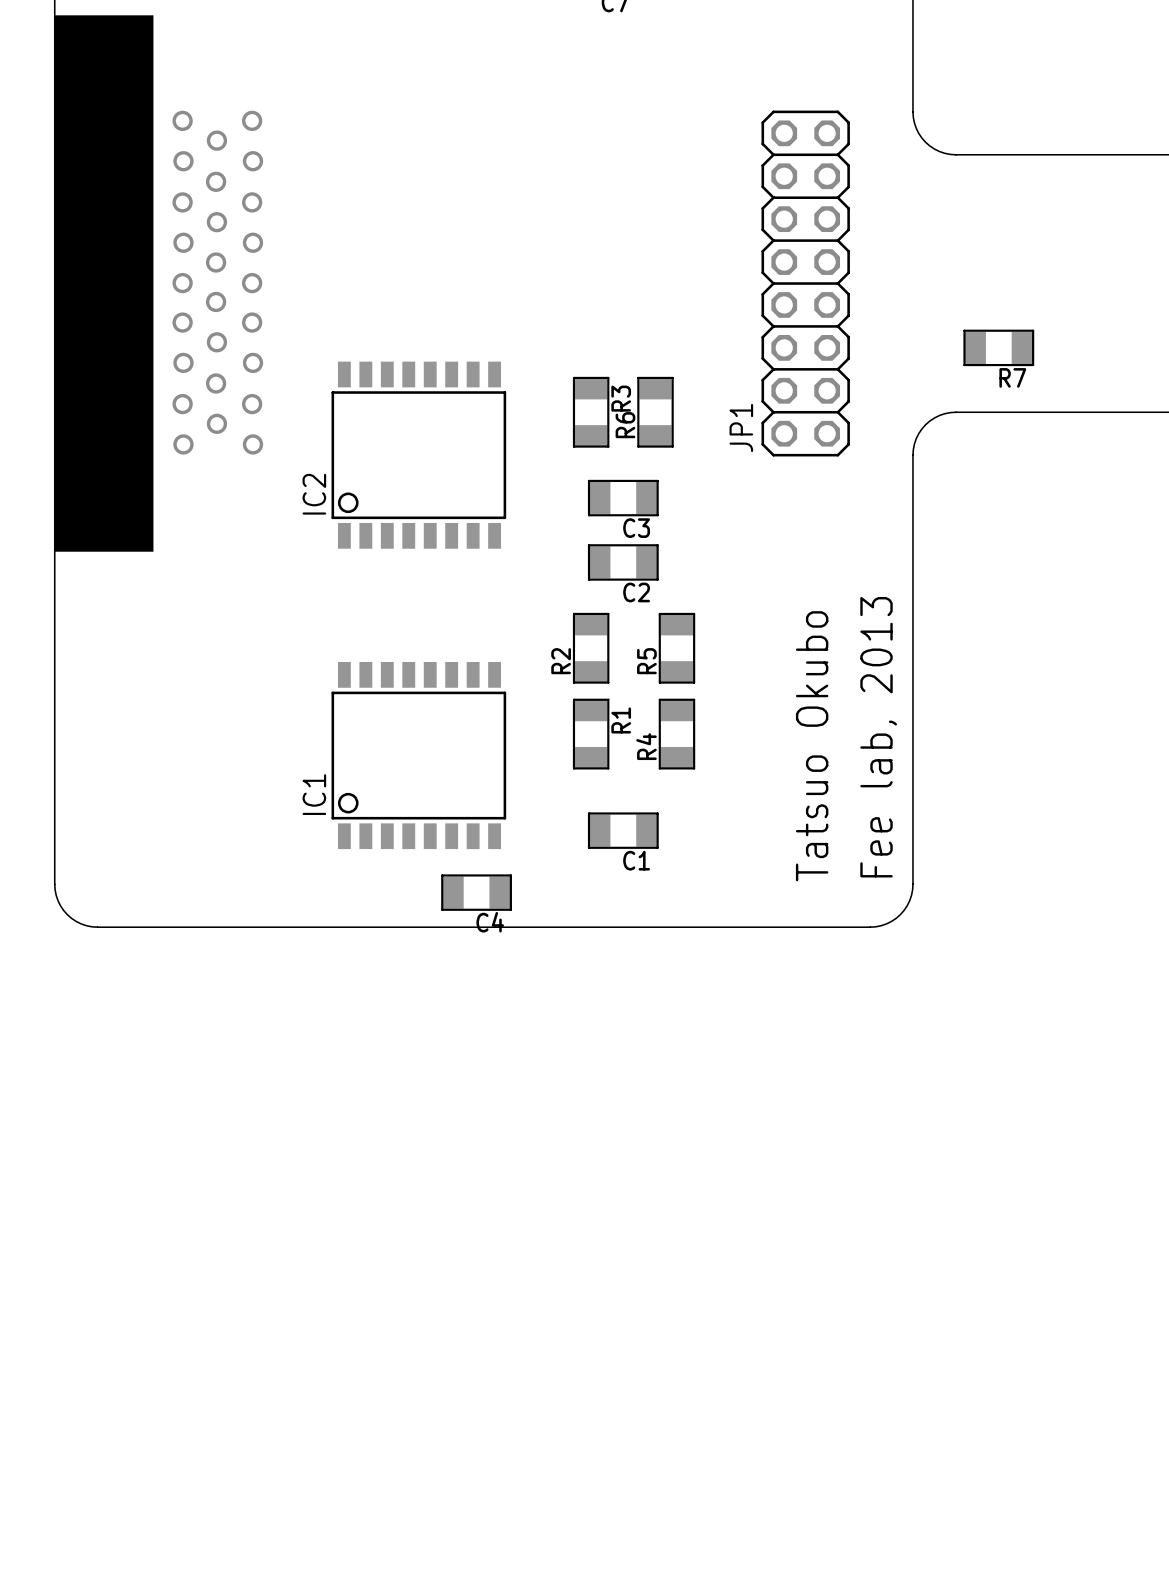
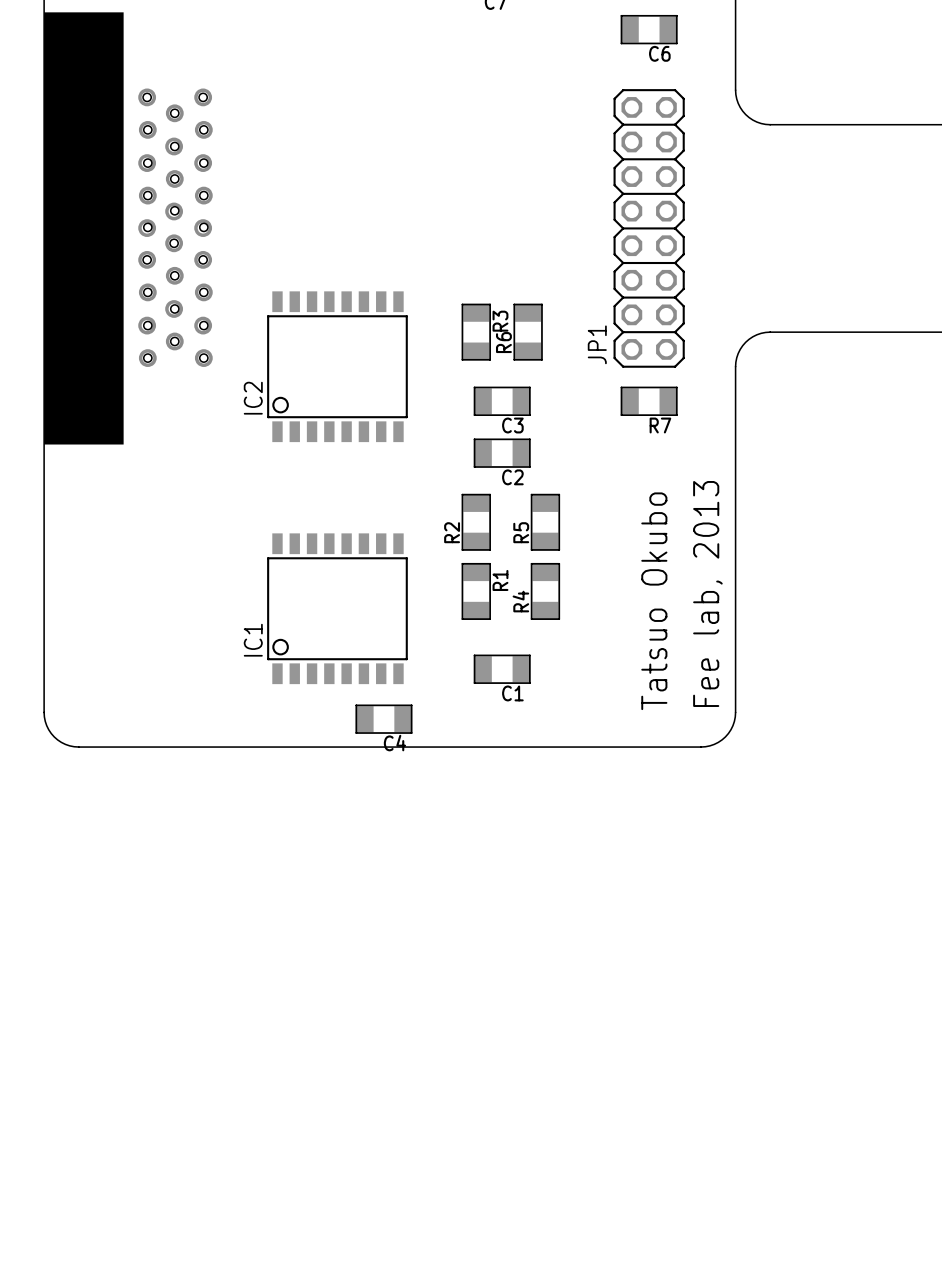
part footprint: [54, 15, 264, 552] -> [44, 12, 213, 445]
C6: none -> (649, 29)
R7 position: (998, 347) -> (649, 401)

